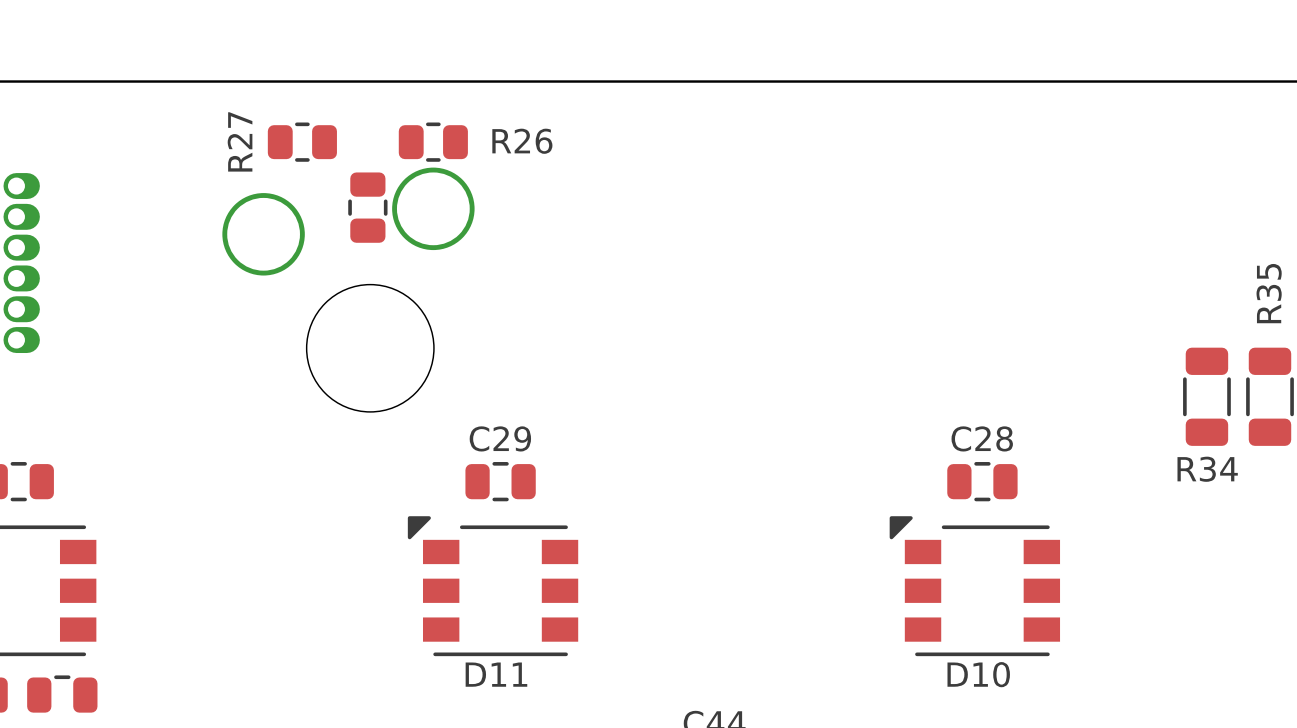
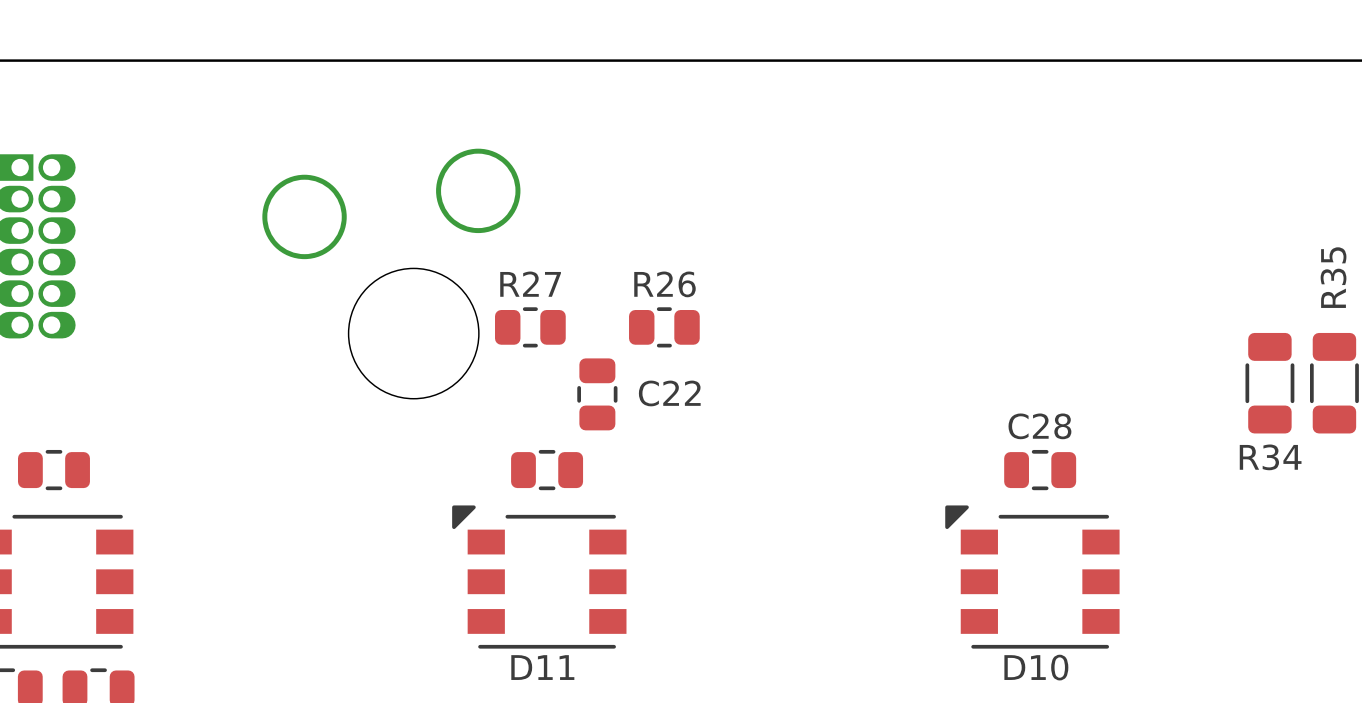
text rotation: 0° (240, 141) -> 90° clockwise (530, 284)
text position: R27 (240, 141) -> R27 (530, 284)
text position: R26 (522, 141) -> R26 (664, 284)
part: (302, 142) -> none
part: (433, 142) -> none
part position: (367, 207) -> (597, 394)
part: none -> (530, 327)
part: none -> (664, 327)
text: none -> C22 (669, 393)
text: C29 (500, 438) -> none

